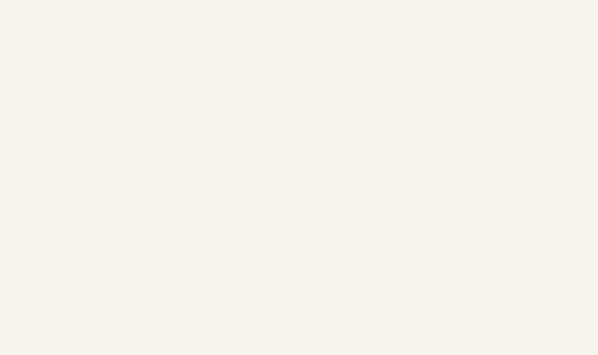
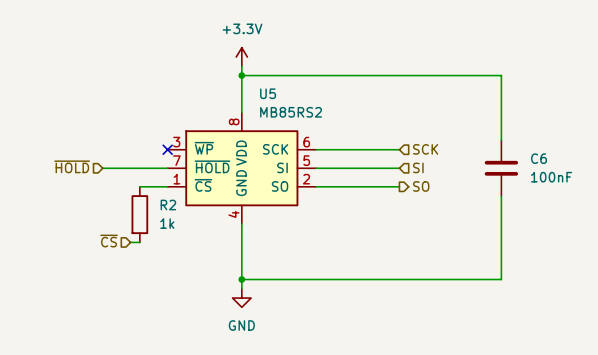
power symbol: none -> +3.3V (241, 57)
wire: none -> (241, 66) (241, 112)
wire: none -> (241, 75) (501, 75) (501, 140)
junction: none -> (241, 75)
no-connect mark: none -> (167, 149)
wire: none -> (315, 149) (399, 149)
hierarchical label: none -> SCK (425, 149)
hierarchical label: none -> ~{HOLD} (72, 166)
hierarchical label: none -> SI (418, 167)
wire: none -> (102, 168) (167, 168)
U5: none -> MB85RS2 (241, 168)
wire: none -> (315, 168) (399, 168)
C6: none -> 100nF (501, 168)
wire: none -> (139, 186) (167, 186)
wire: none -> (315, 186) (399, 186)
hierarchical label: none -> SO (421, 186)
wire: none -> (501, 196) (501, 279) (241, 279)
R2: none -> 1k (139, 214)
wire: none -> (241, 223) (241, 288)
hierarchical label: none -> ~{CS} (109, 241)
wire: none -> (130, 242) (139, 242)
junction: none -> (241, 279)
power symbol: none -> GND (241, 298)

